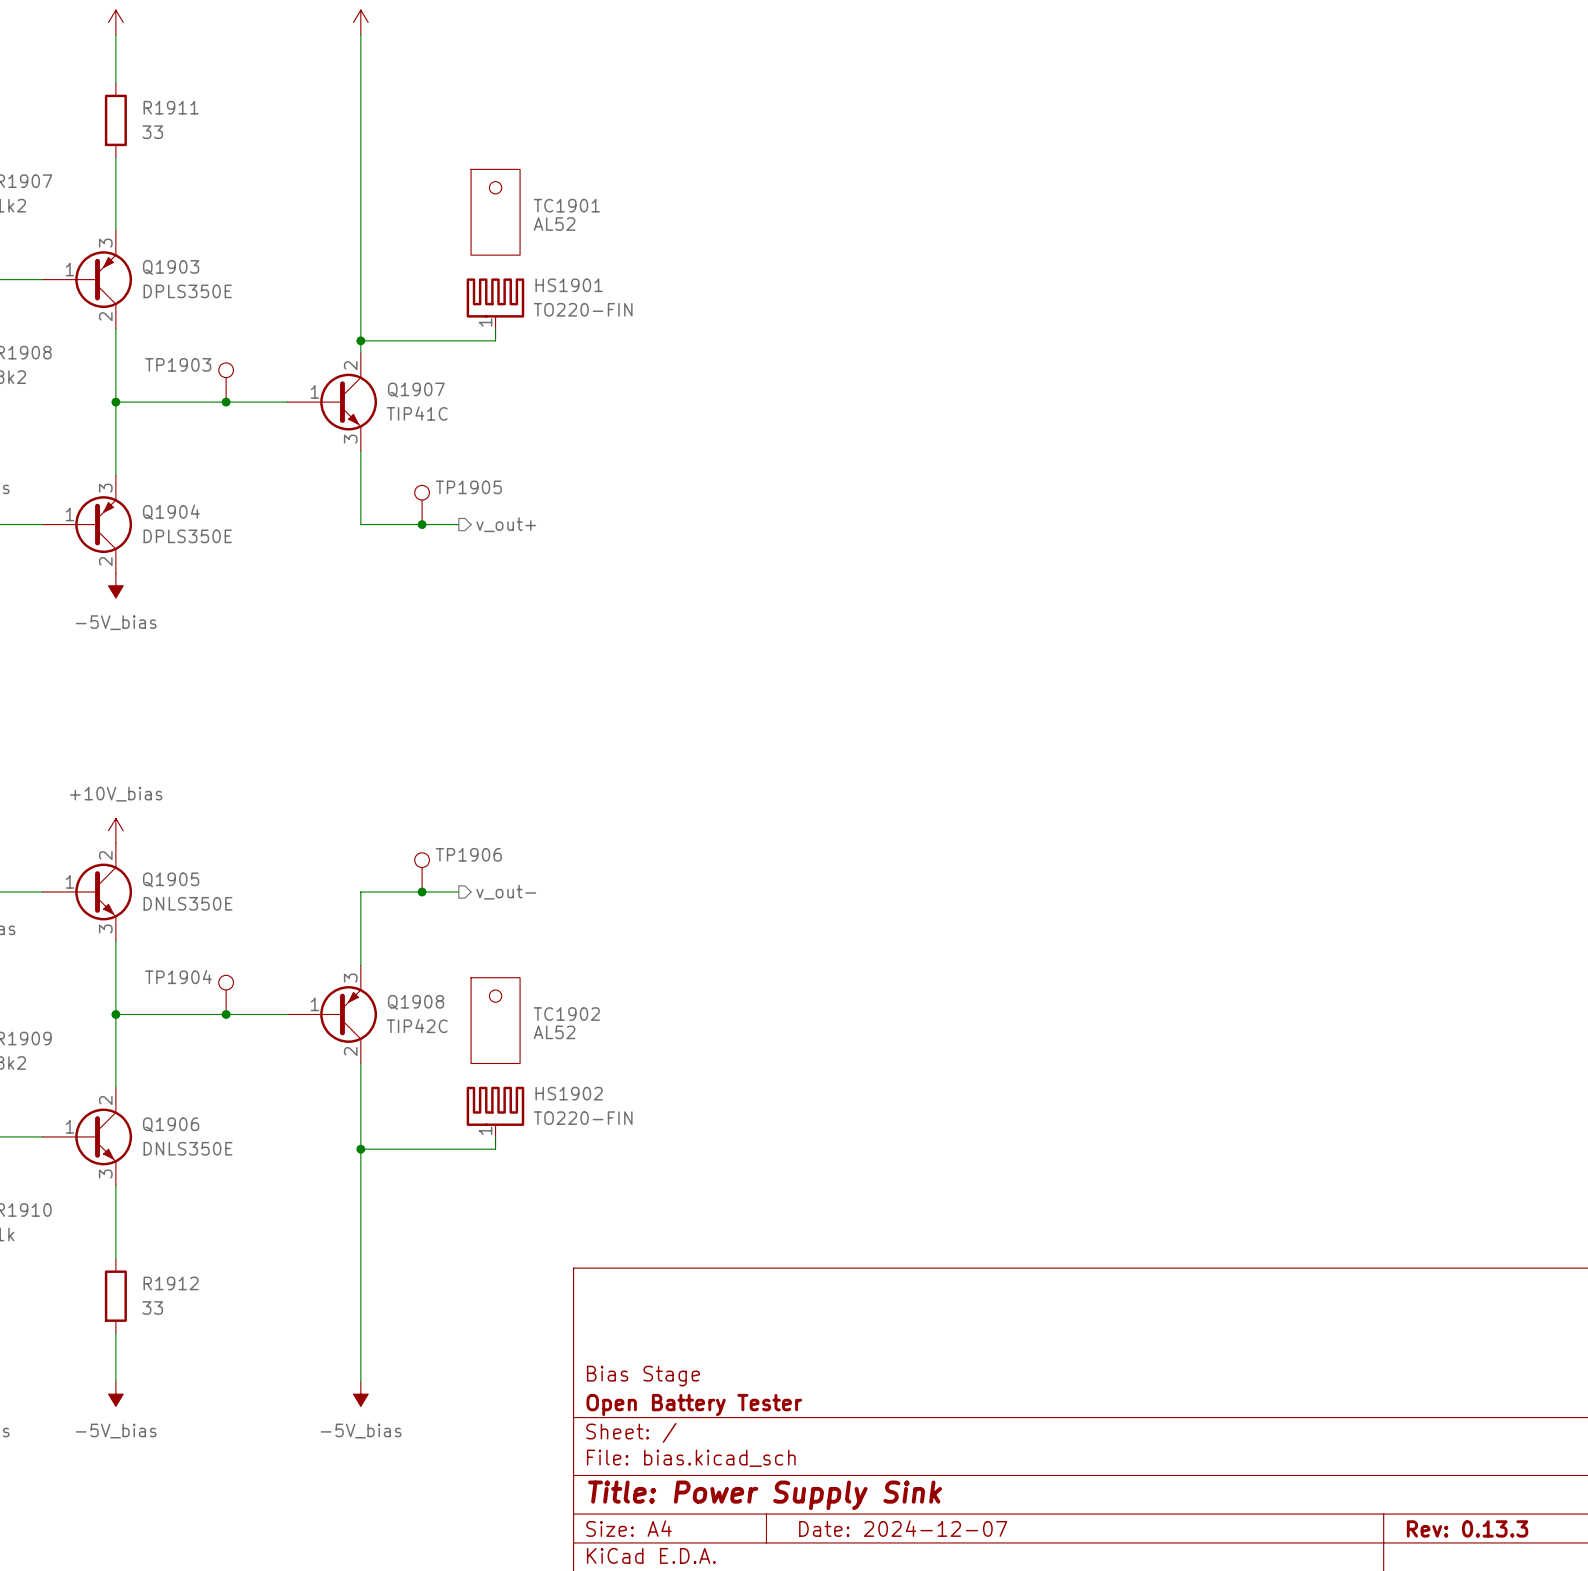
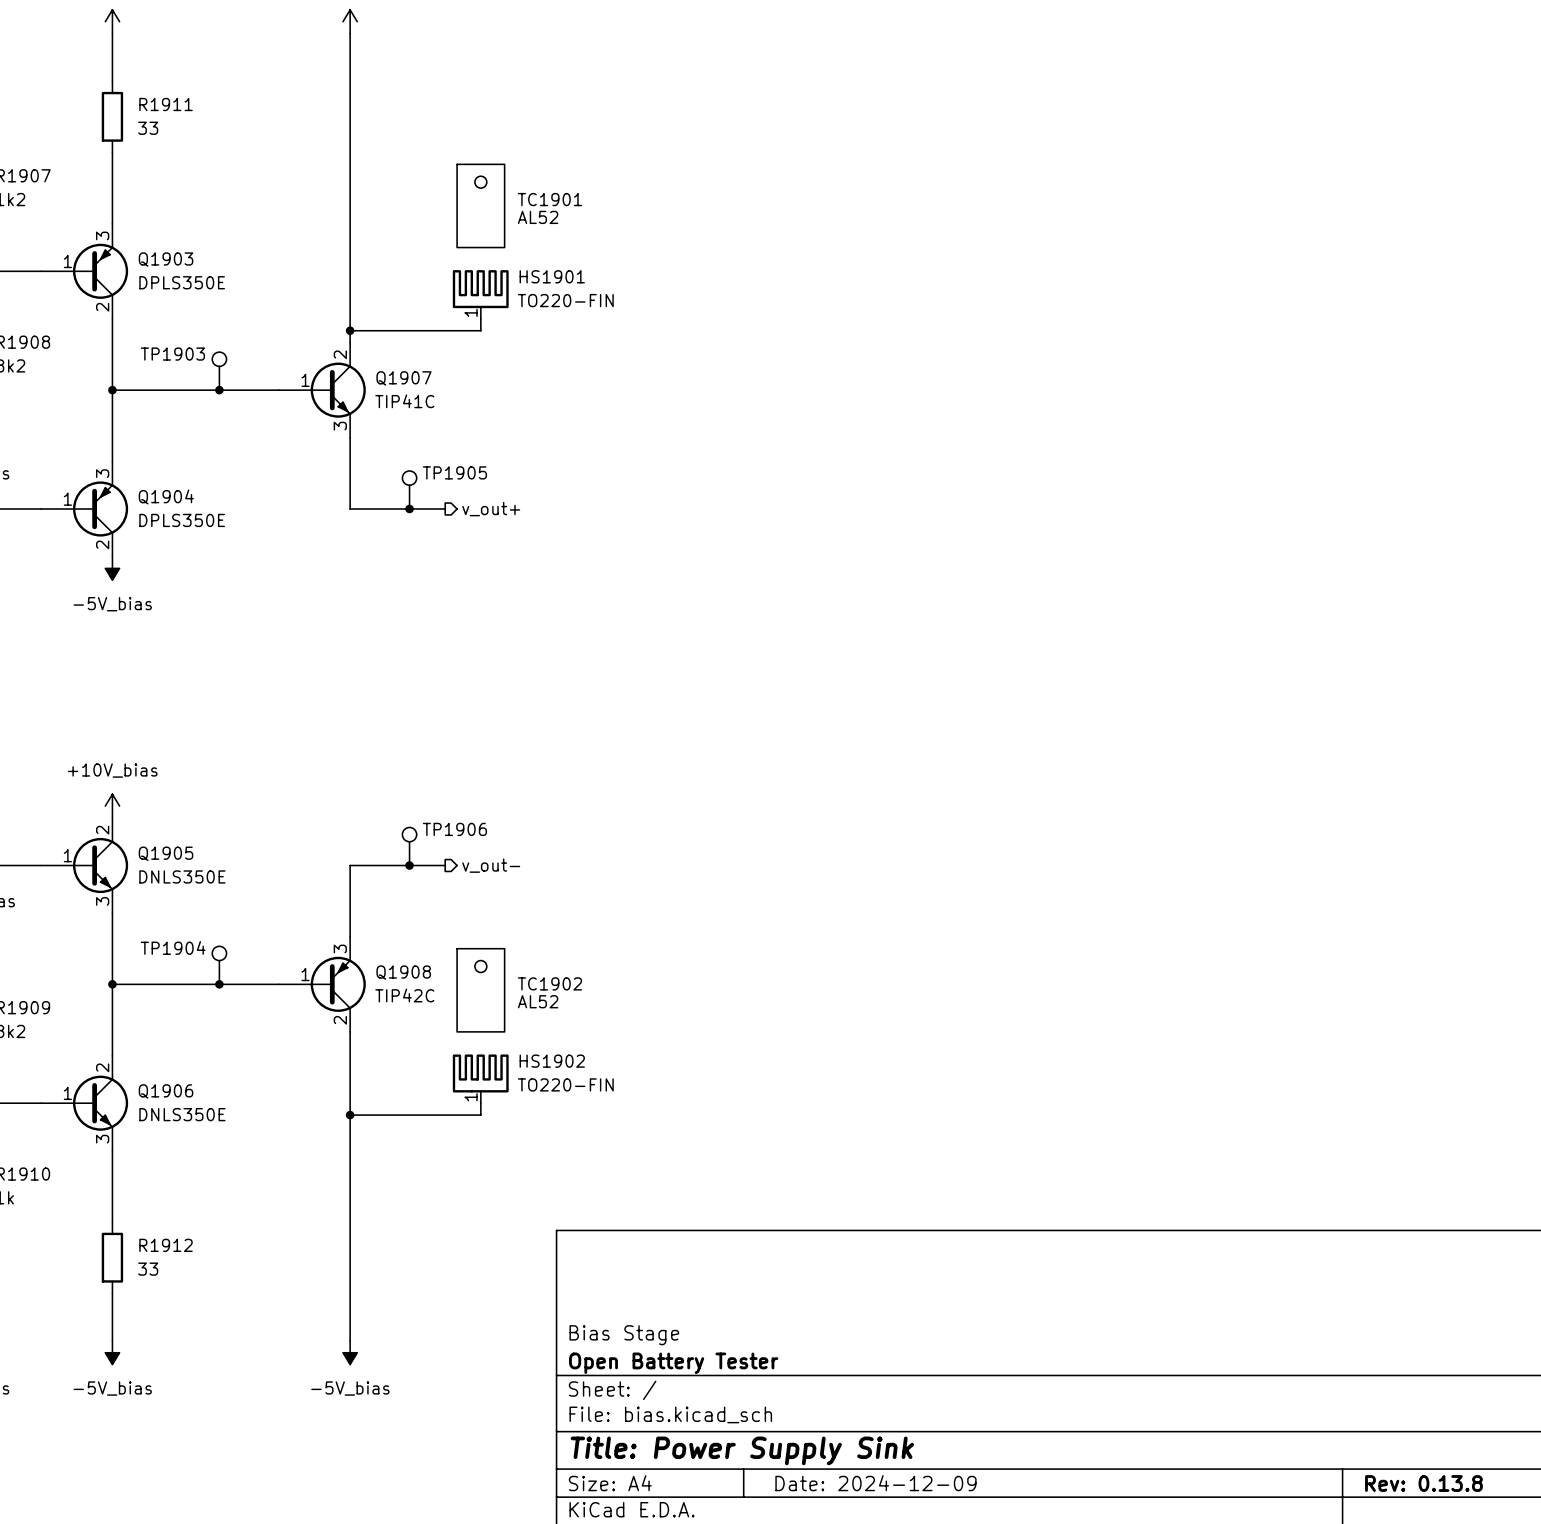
title block: Date: 2024-12-07 (903, 1528) -> Date: 2024-12-09 (875, 1483)
title block: Rev: 0.13.3 (1467, 1528) -> Rev: 0.13.8 (1423, 1483)

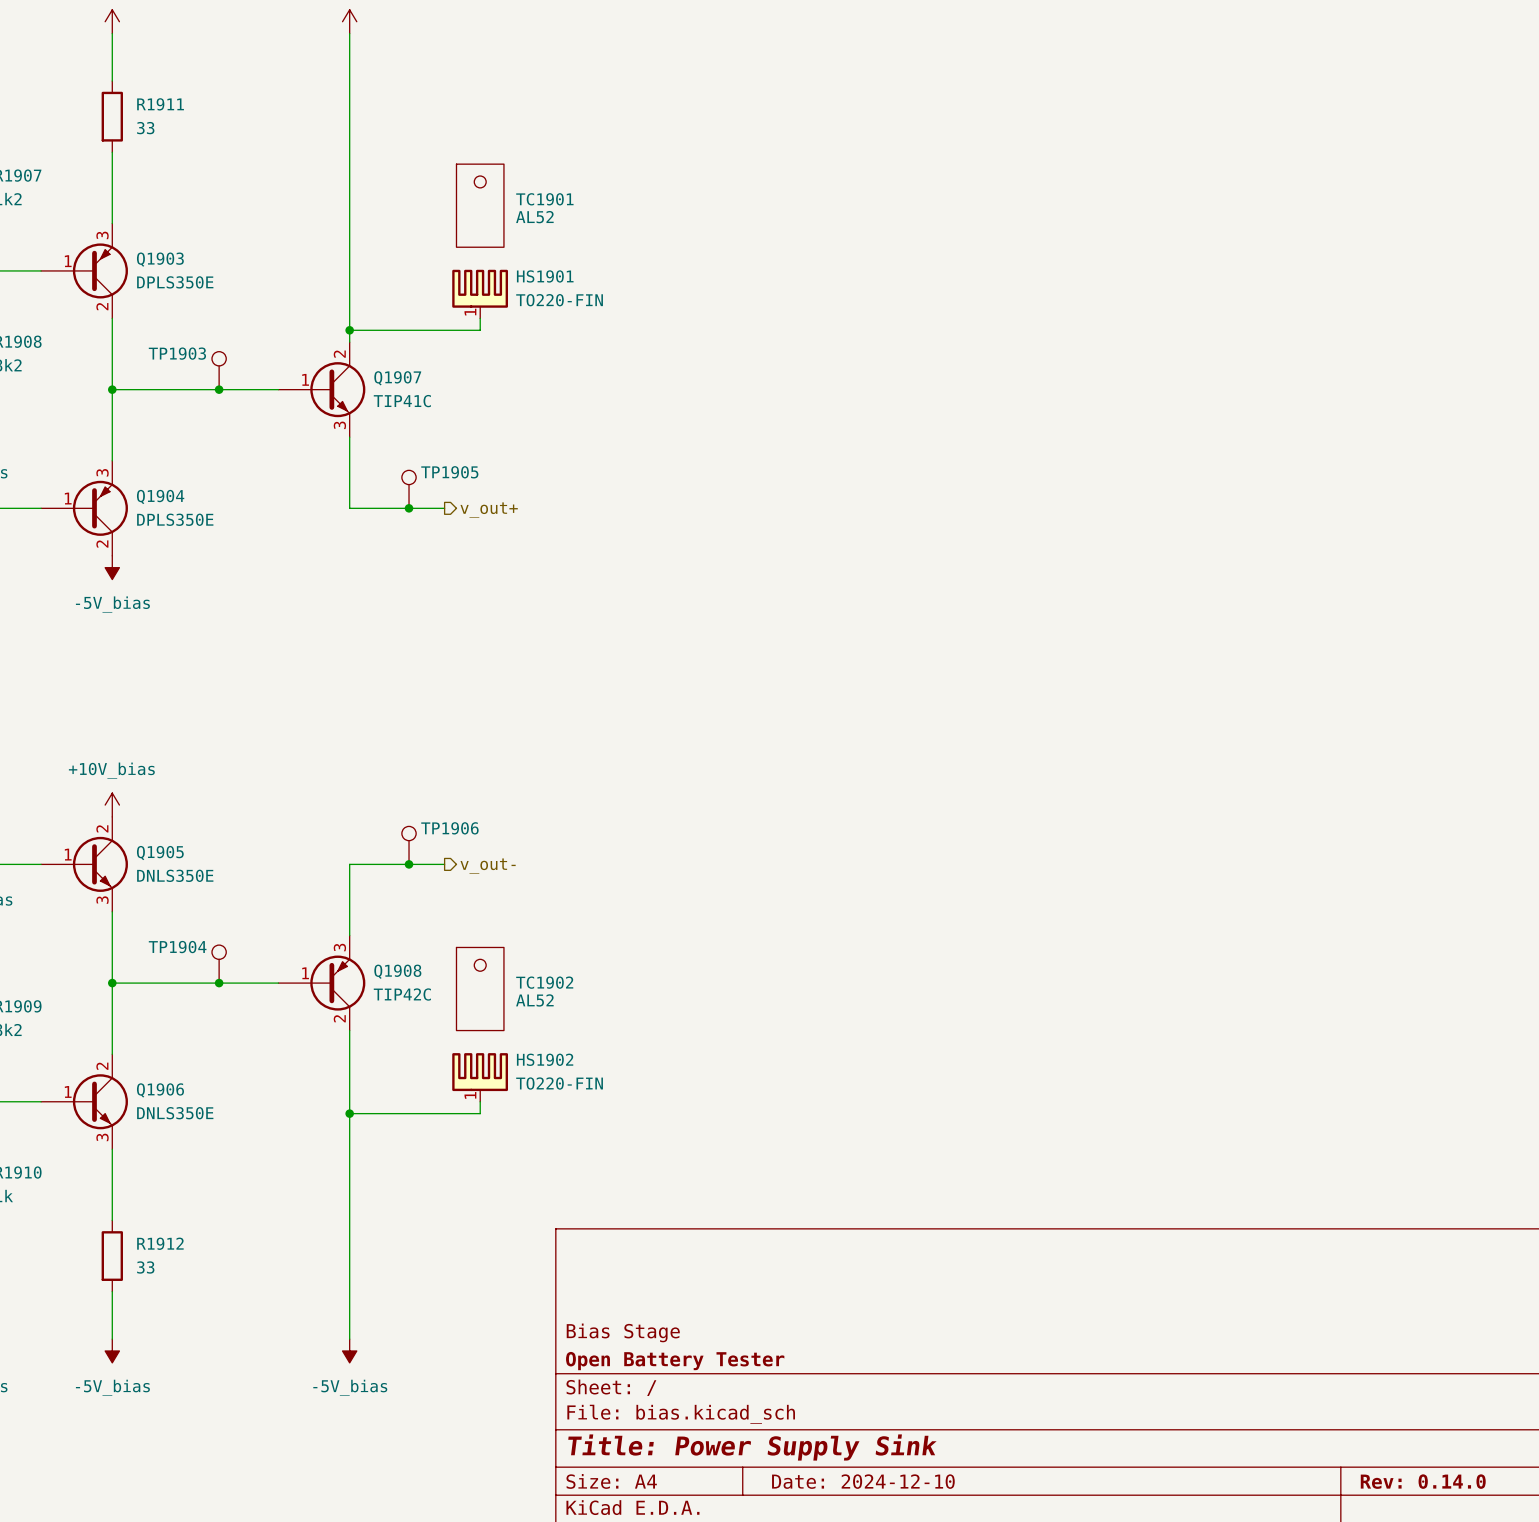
title block: Date: 2024-12-09 (875, 1483) -> Date: 2024-12-10 (863, 1481)
title block: Rev: 0.13.8 (1423, 1483) -> Rev: 0.14.0 (1423, 1481)

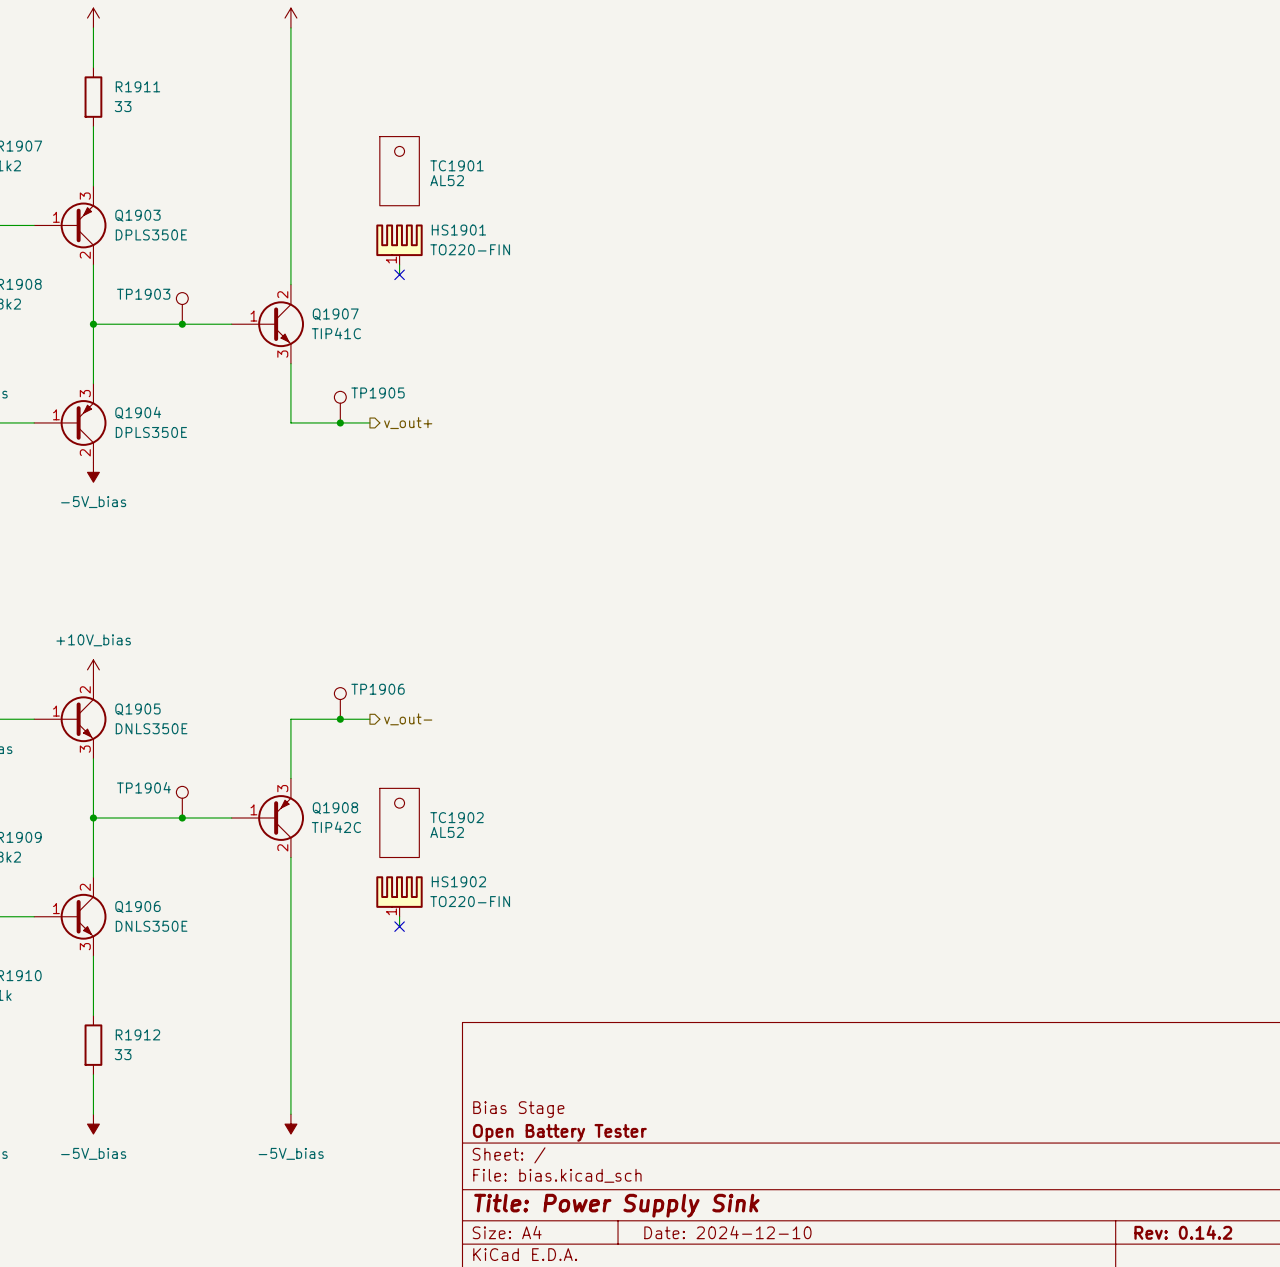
wire: (349, 330) (480, 330) -> none
junction: (349, 330) -> none
no-connect mark: none -> (399, 274)
wire: (349, 1113) (480, 1113) -> none
junction: (349, 1113) -> none
no-connect mark: none -> (399, 926)
title block: Rev: 0.14.0 (1423, 1481) -> Rev: 0.14.2 (1183, 1232)

